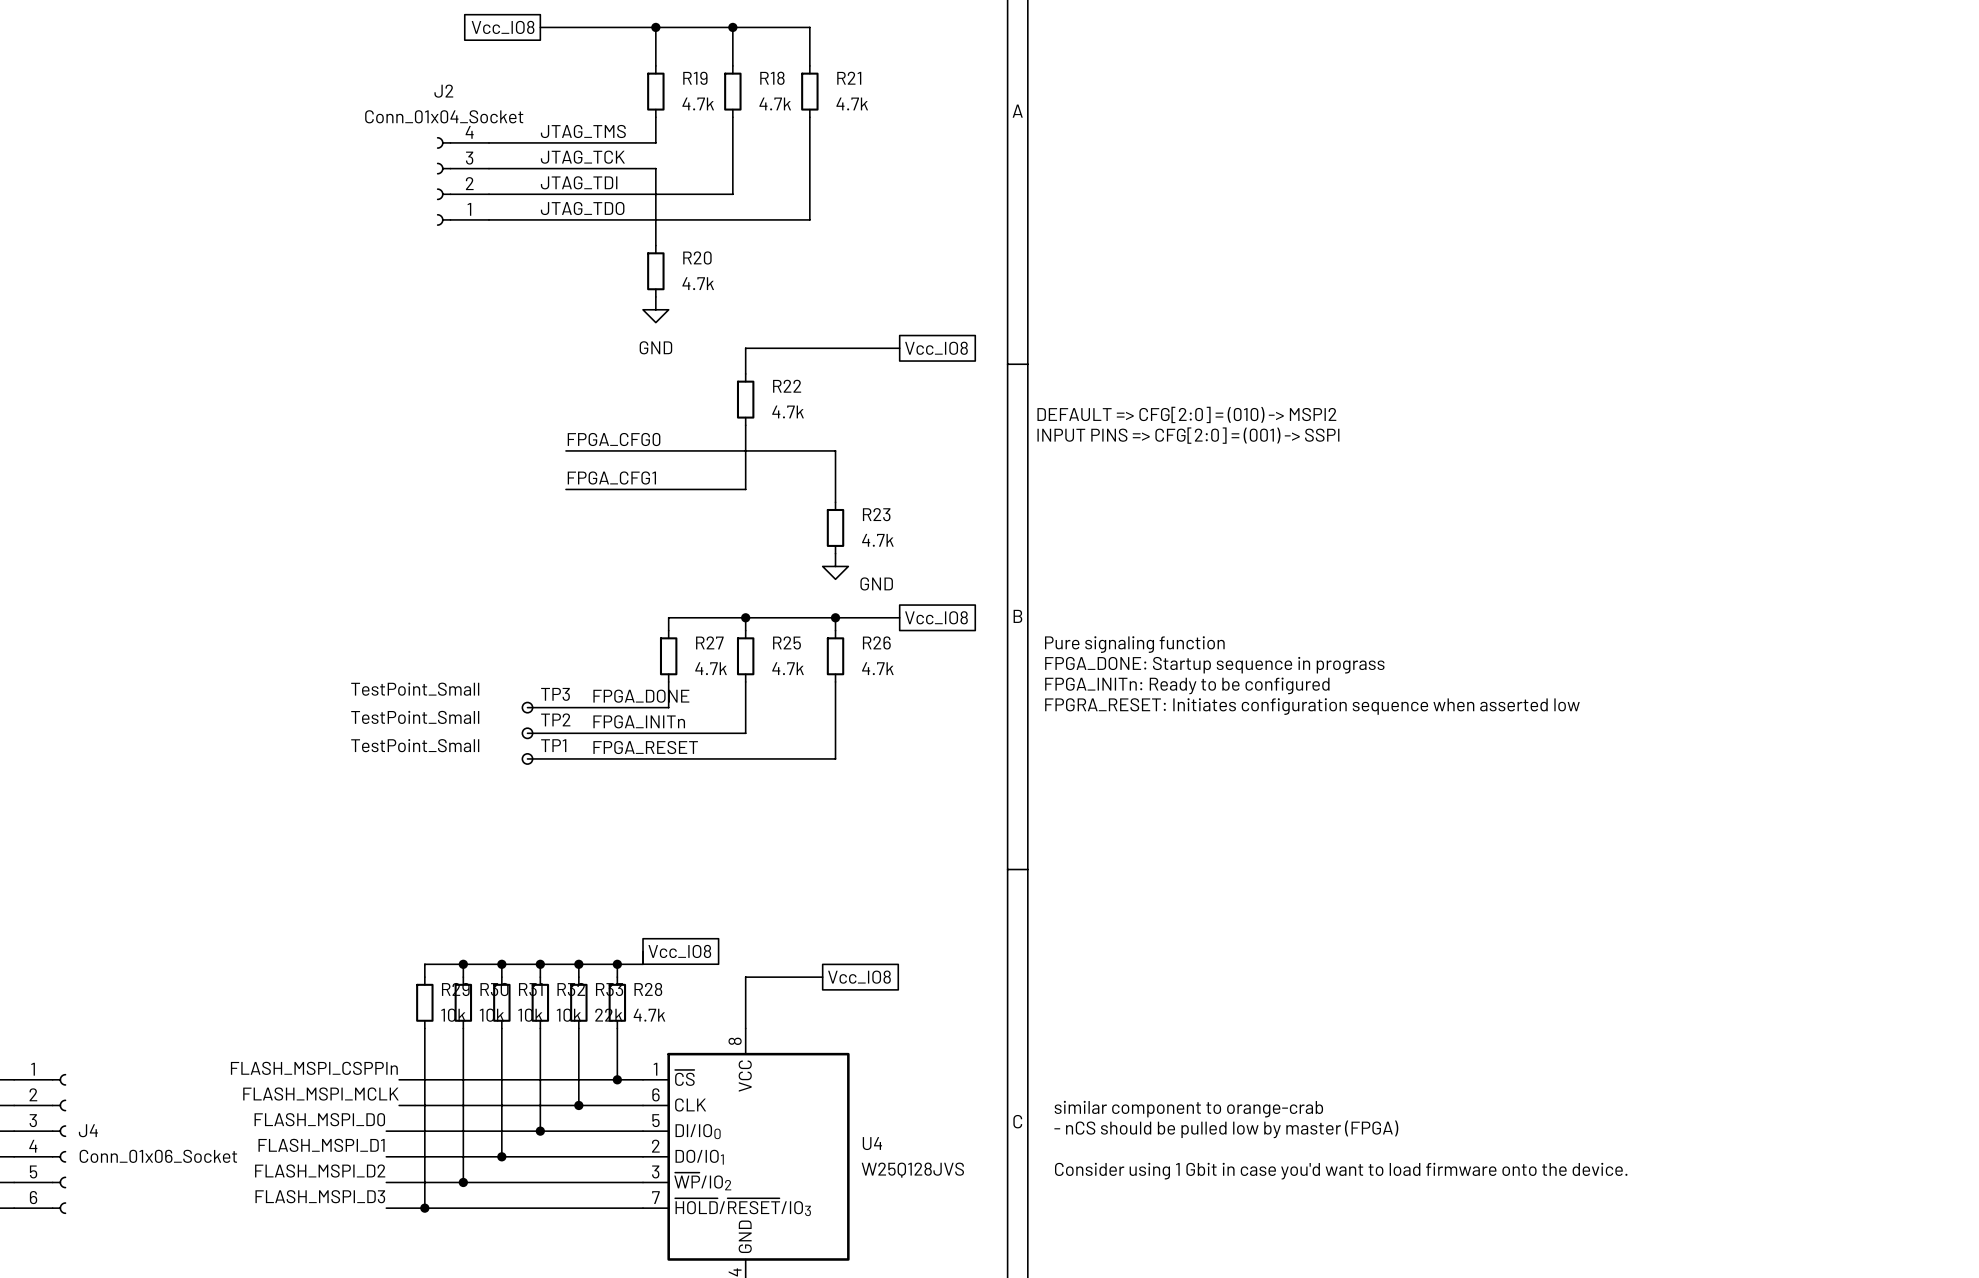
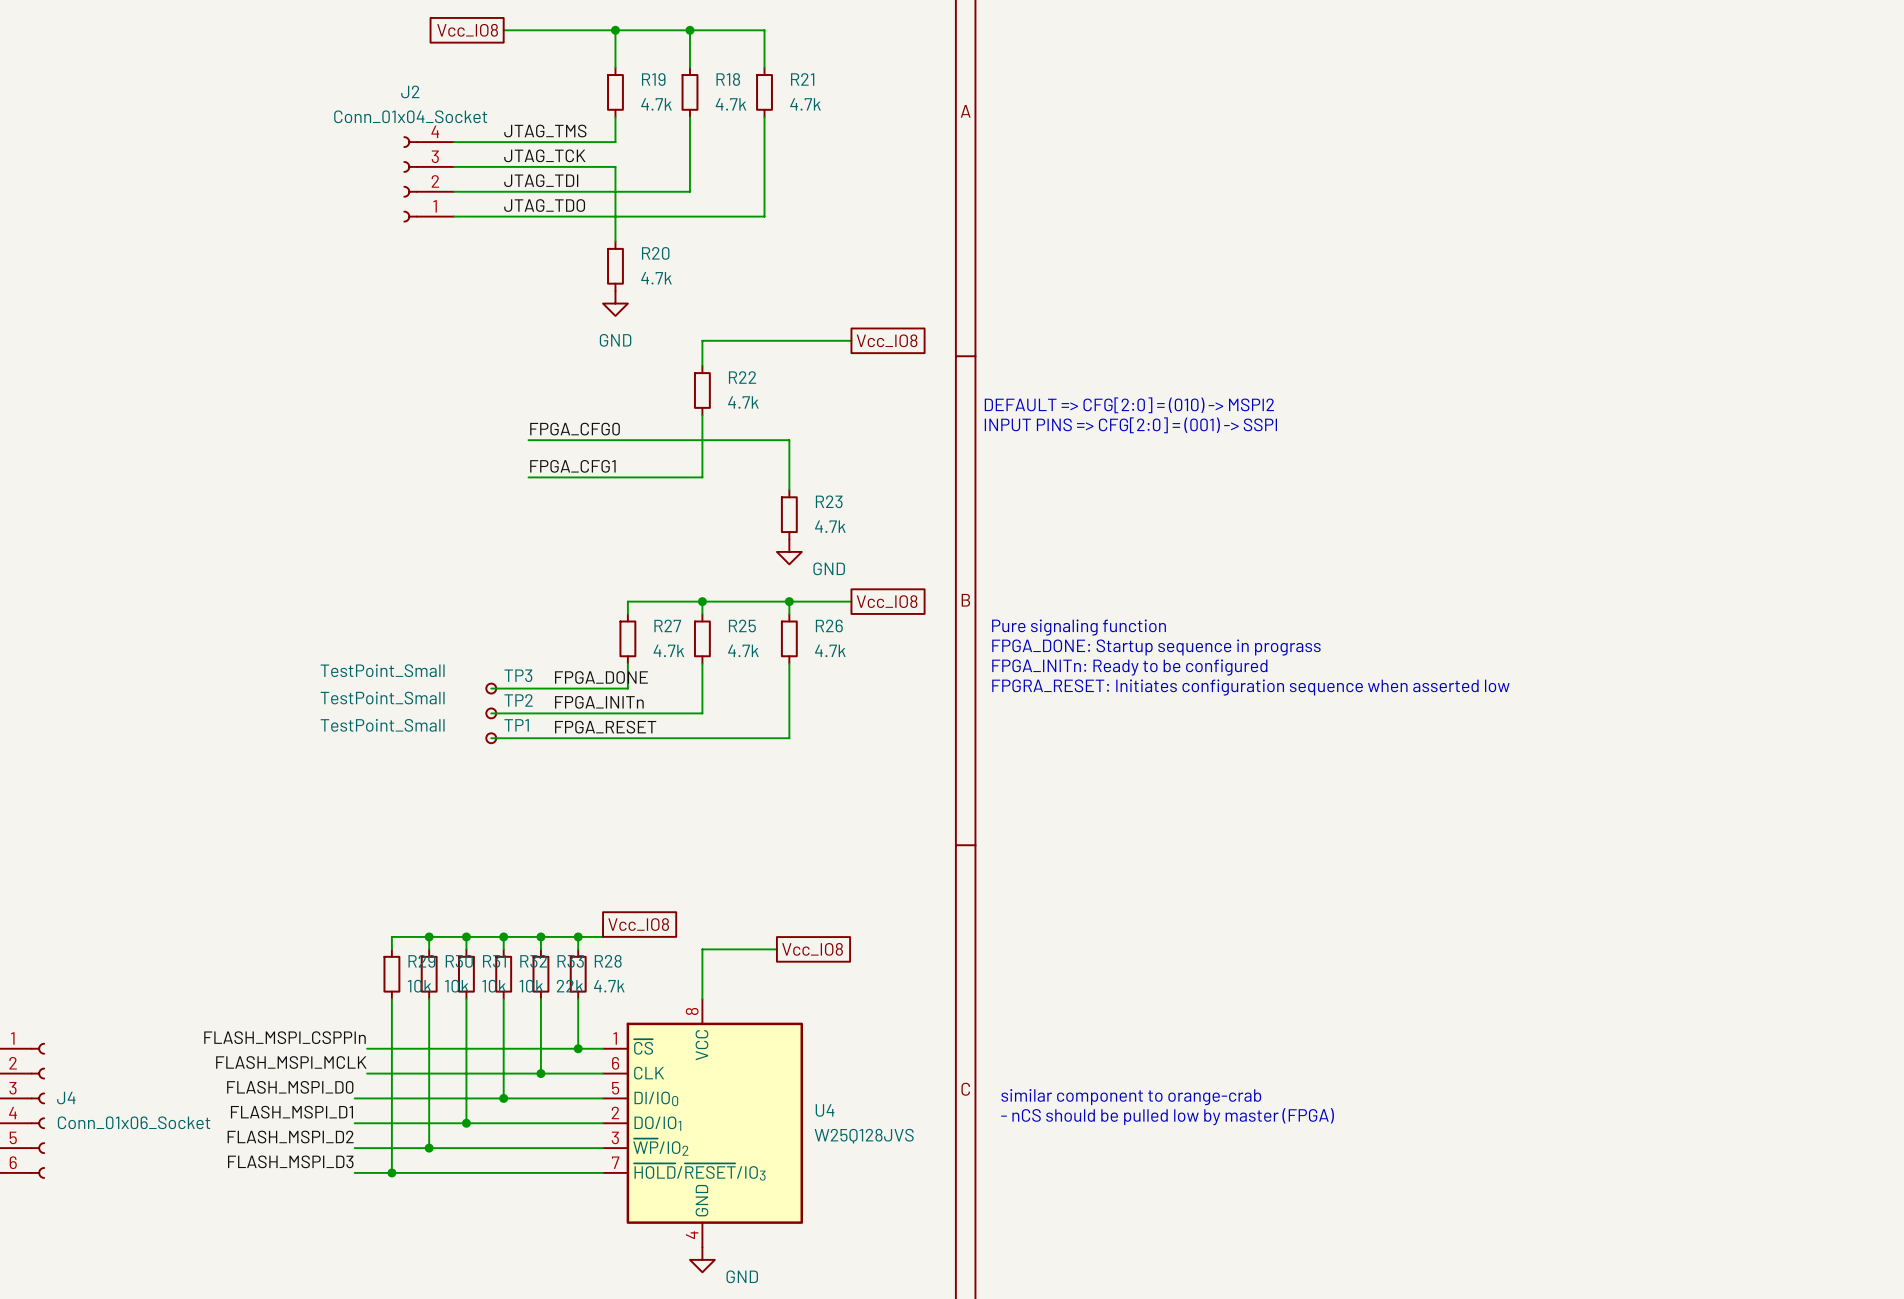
text: similar component to orange-crab (1188, 1109) -> none
text: - nCS should be pulled low by master (FPGA) (1226, 1129) -> similar component to orange-crab (1131, 1097)
text: none -> - nCS should be pulled low by master (FPGA) (1167, 1116)
text: Consider using 1 Gbit in case you'd want to load firmware onto the device. (1341, 1171) -> none

